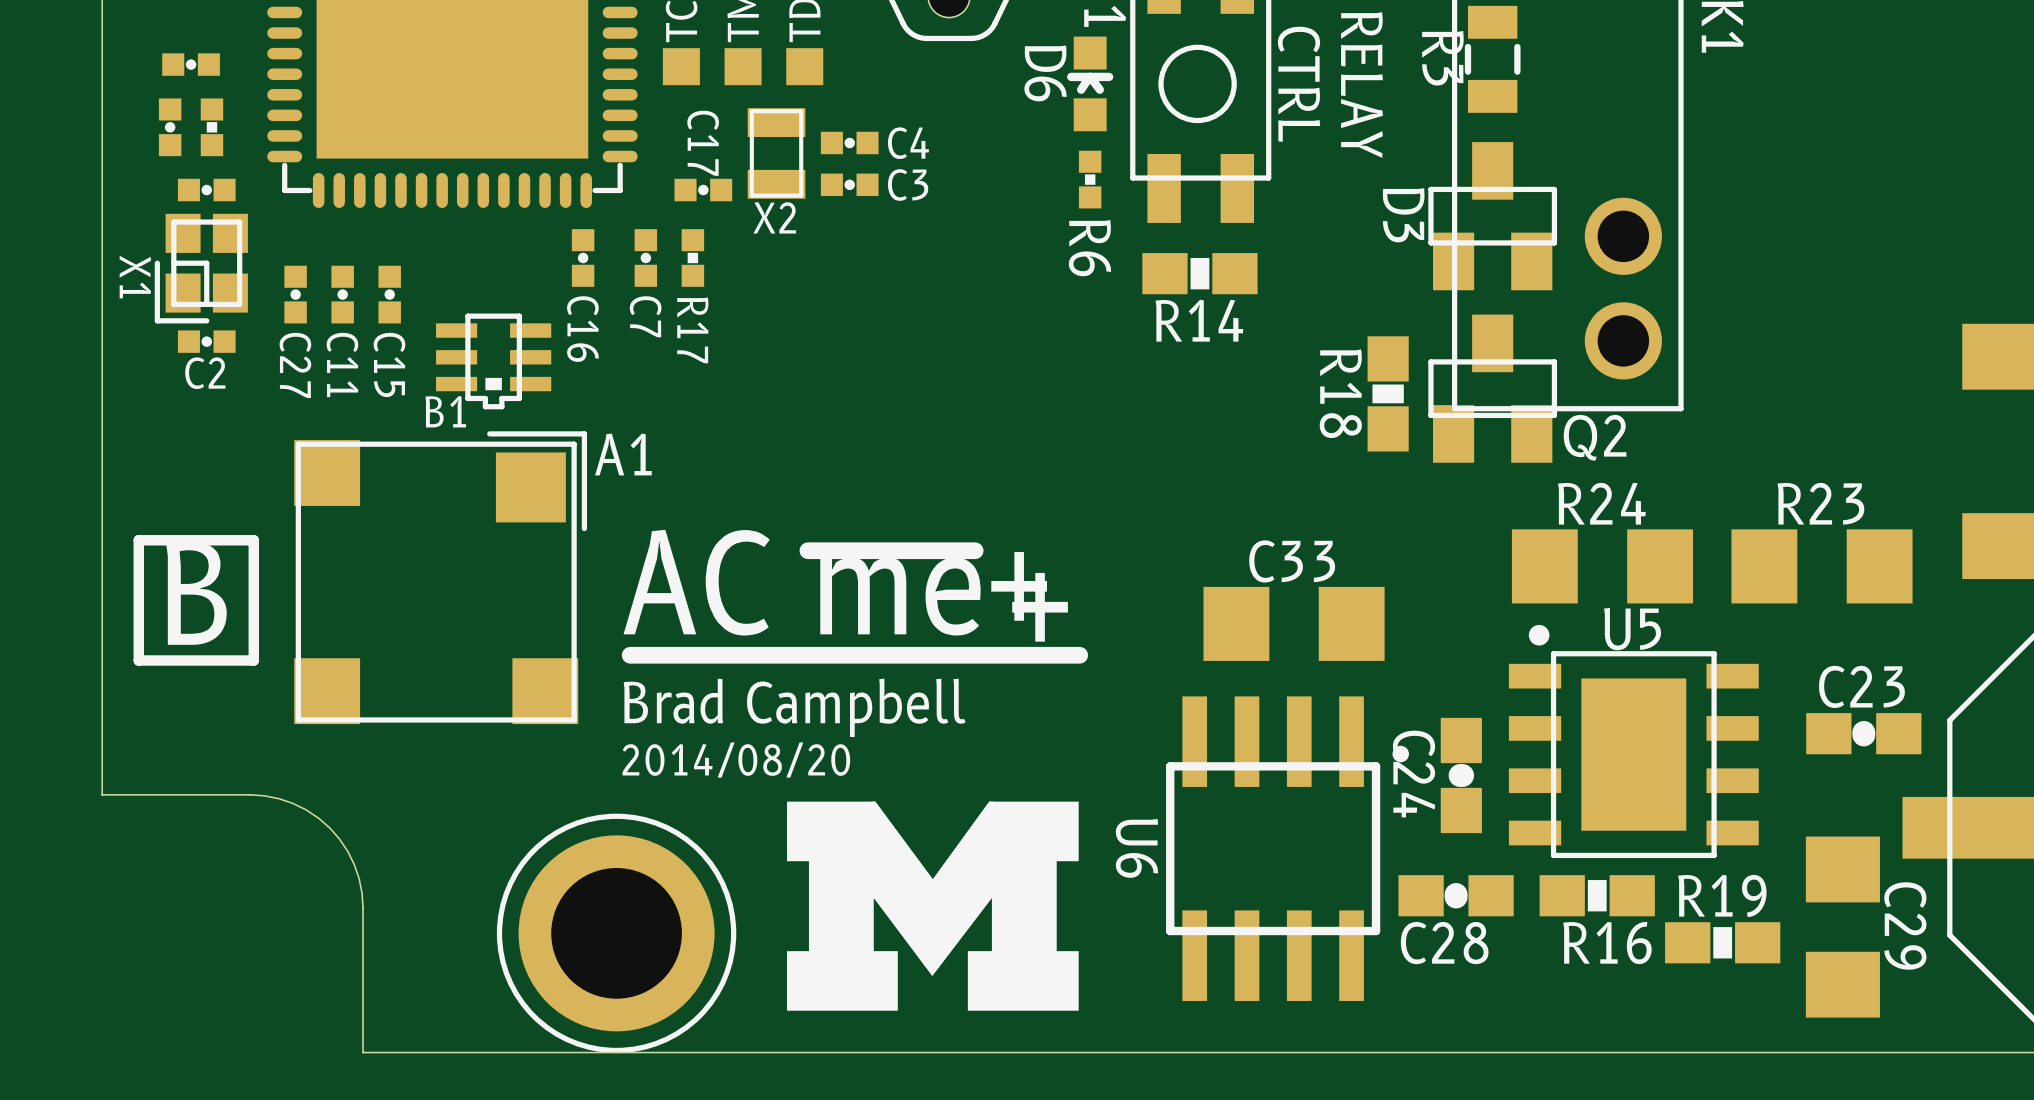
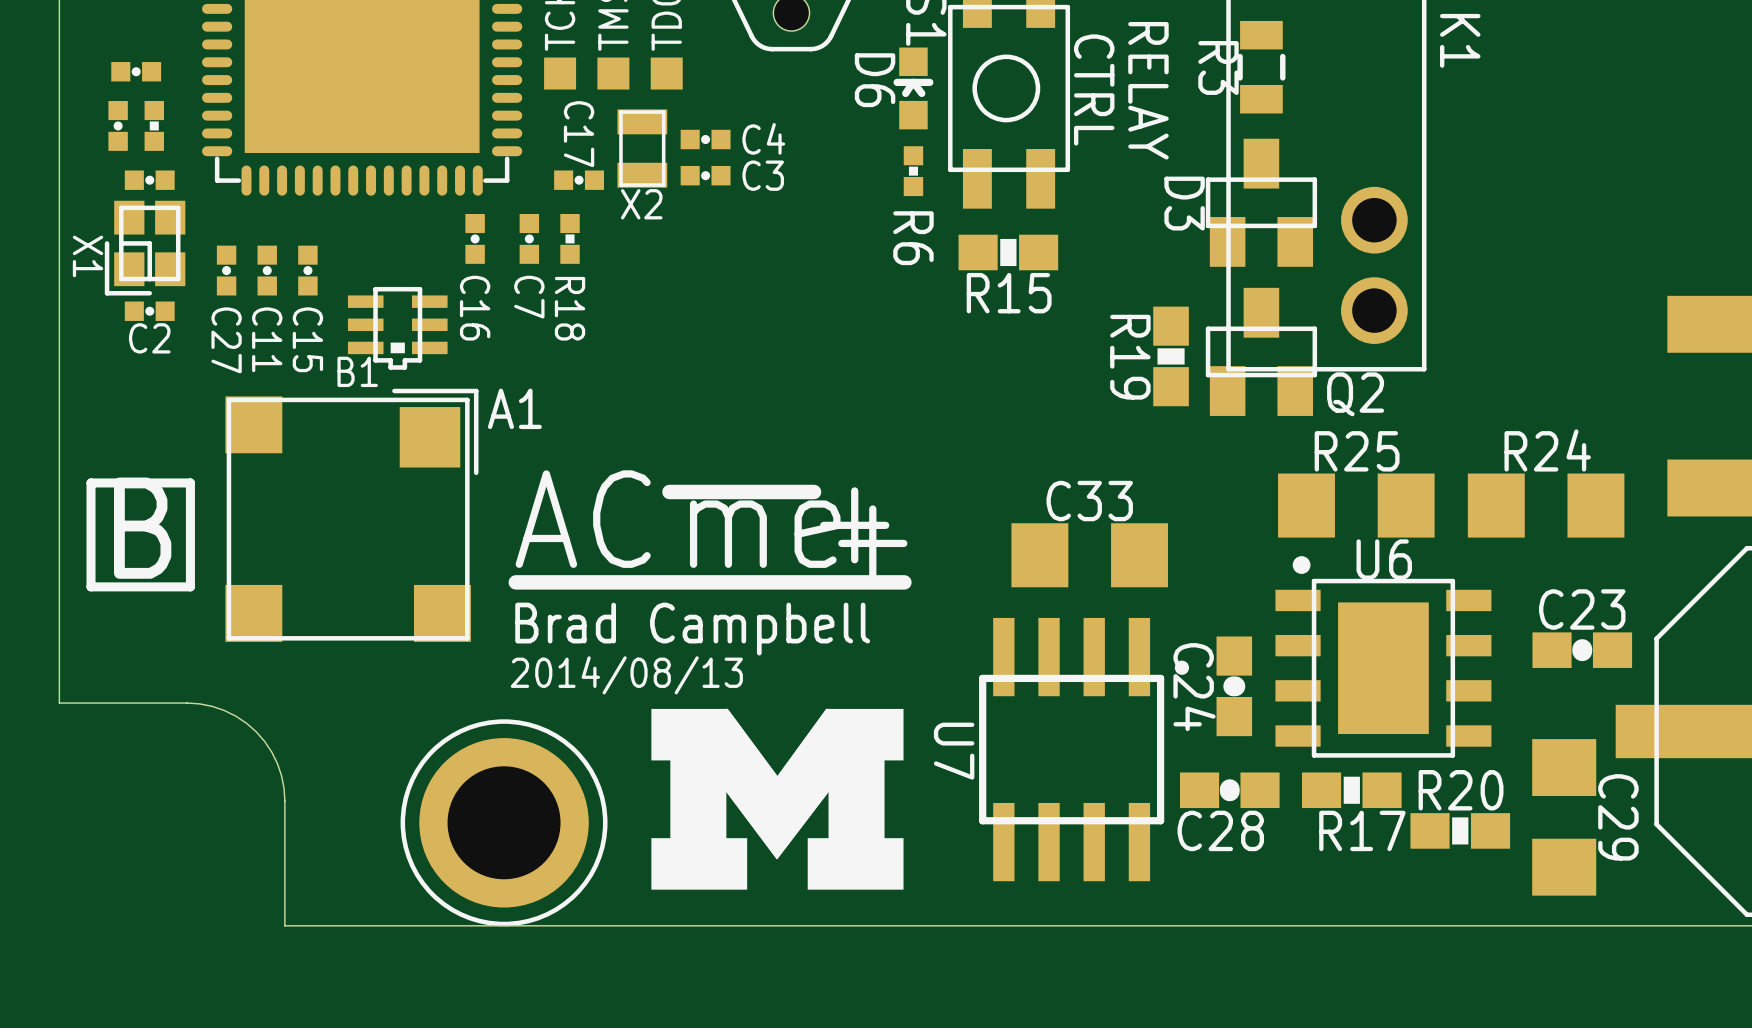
R14 name: R14 (1199, 320) -> R15 (1009, 293)
R17 name: R17 (692, 330) -> R18 (570, 308)
R18 name: R18 (1340, 393) -> R19 (1130, 357)
R24 name: R24 (1601, 503) -> R25 (1357, 451)
R23 name: R23 (1820, 503) -> R24 (1547, 450)
U5 name: U5 (1632, 629) -> U6 (1384, 559)
text: 2014/08/20 (736, 760) -> 2014/08/13 (626, 675)
U6 name: U6 (1136, 848) -> U7 (954, 751)
R19 name: R19 (1722, 895) -> R20 (1461, 790)
R16 name: R16 (1607, 943) -> R17 (1362, 830)

